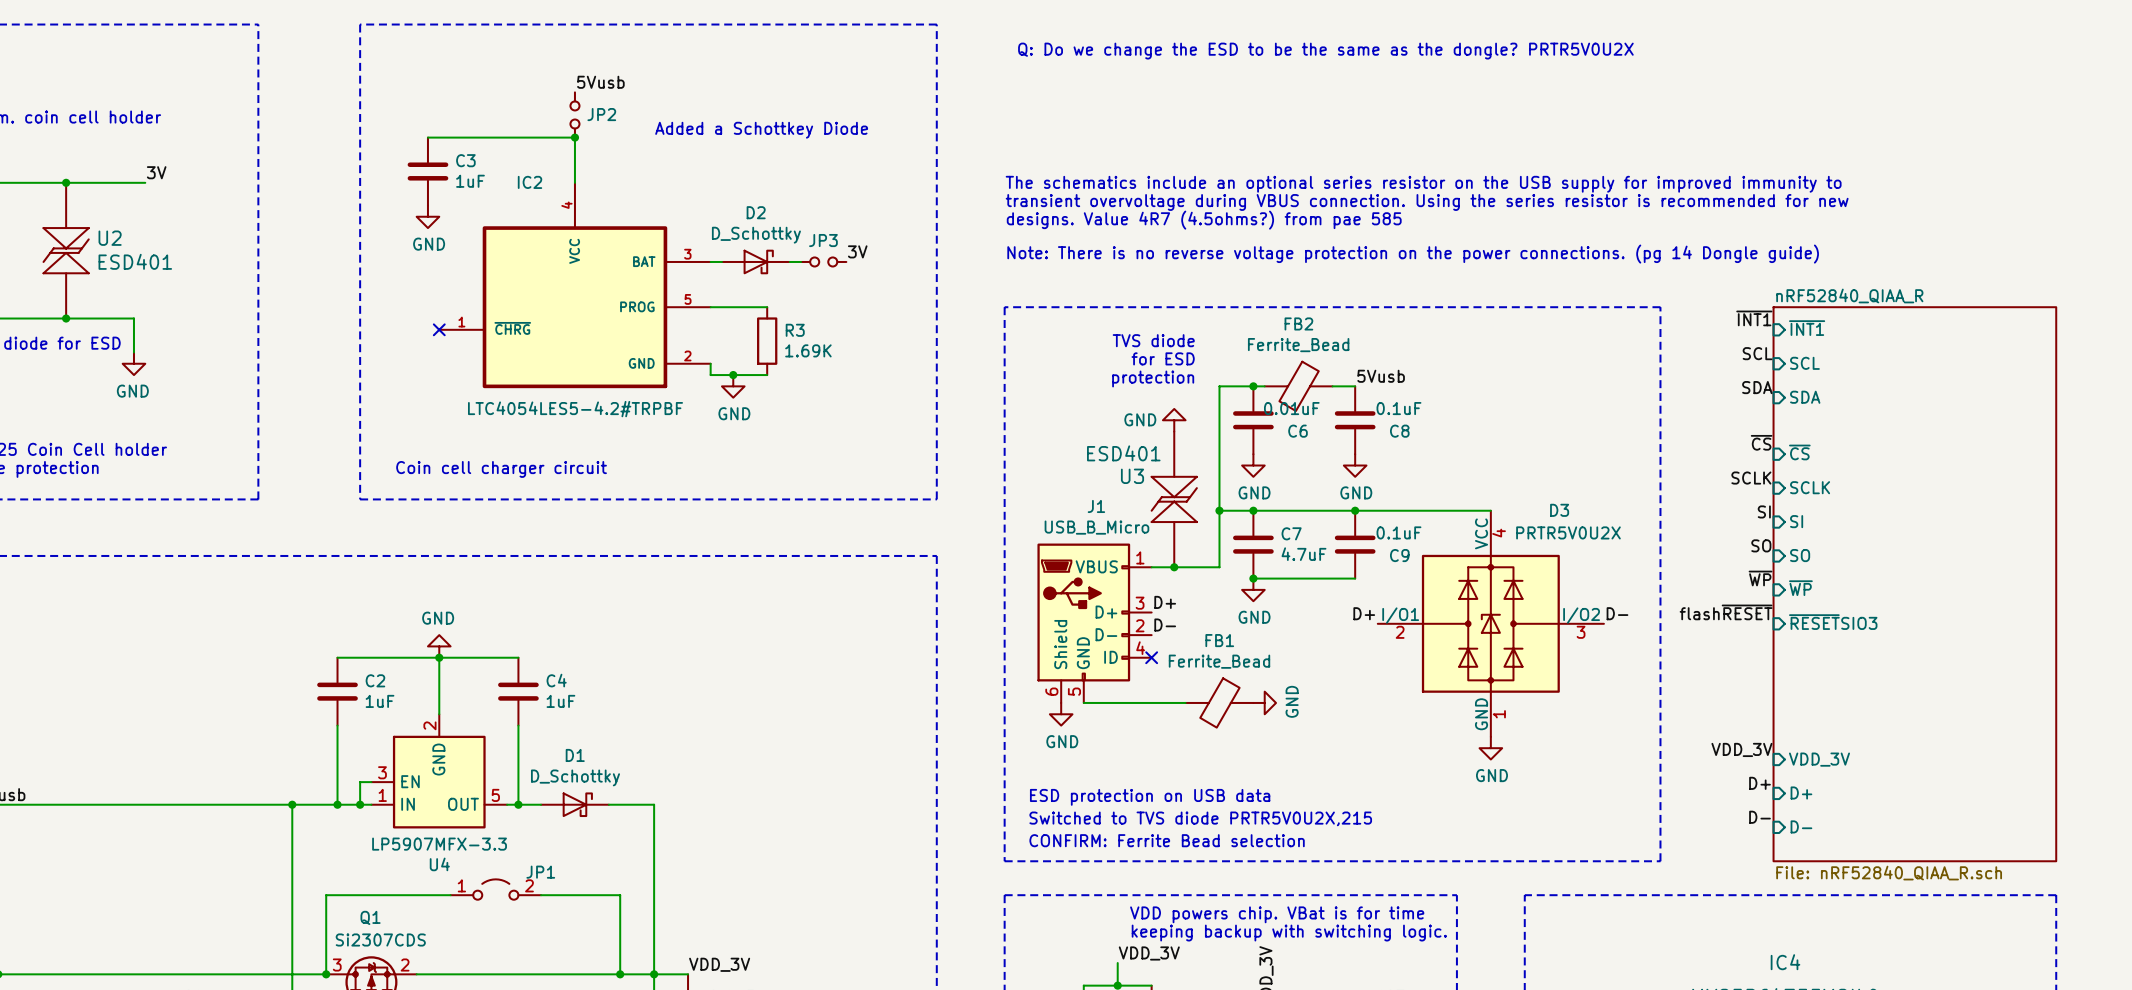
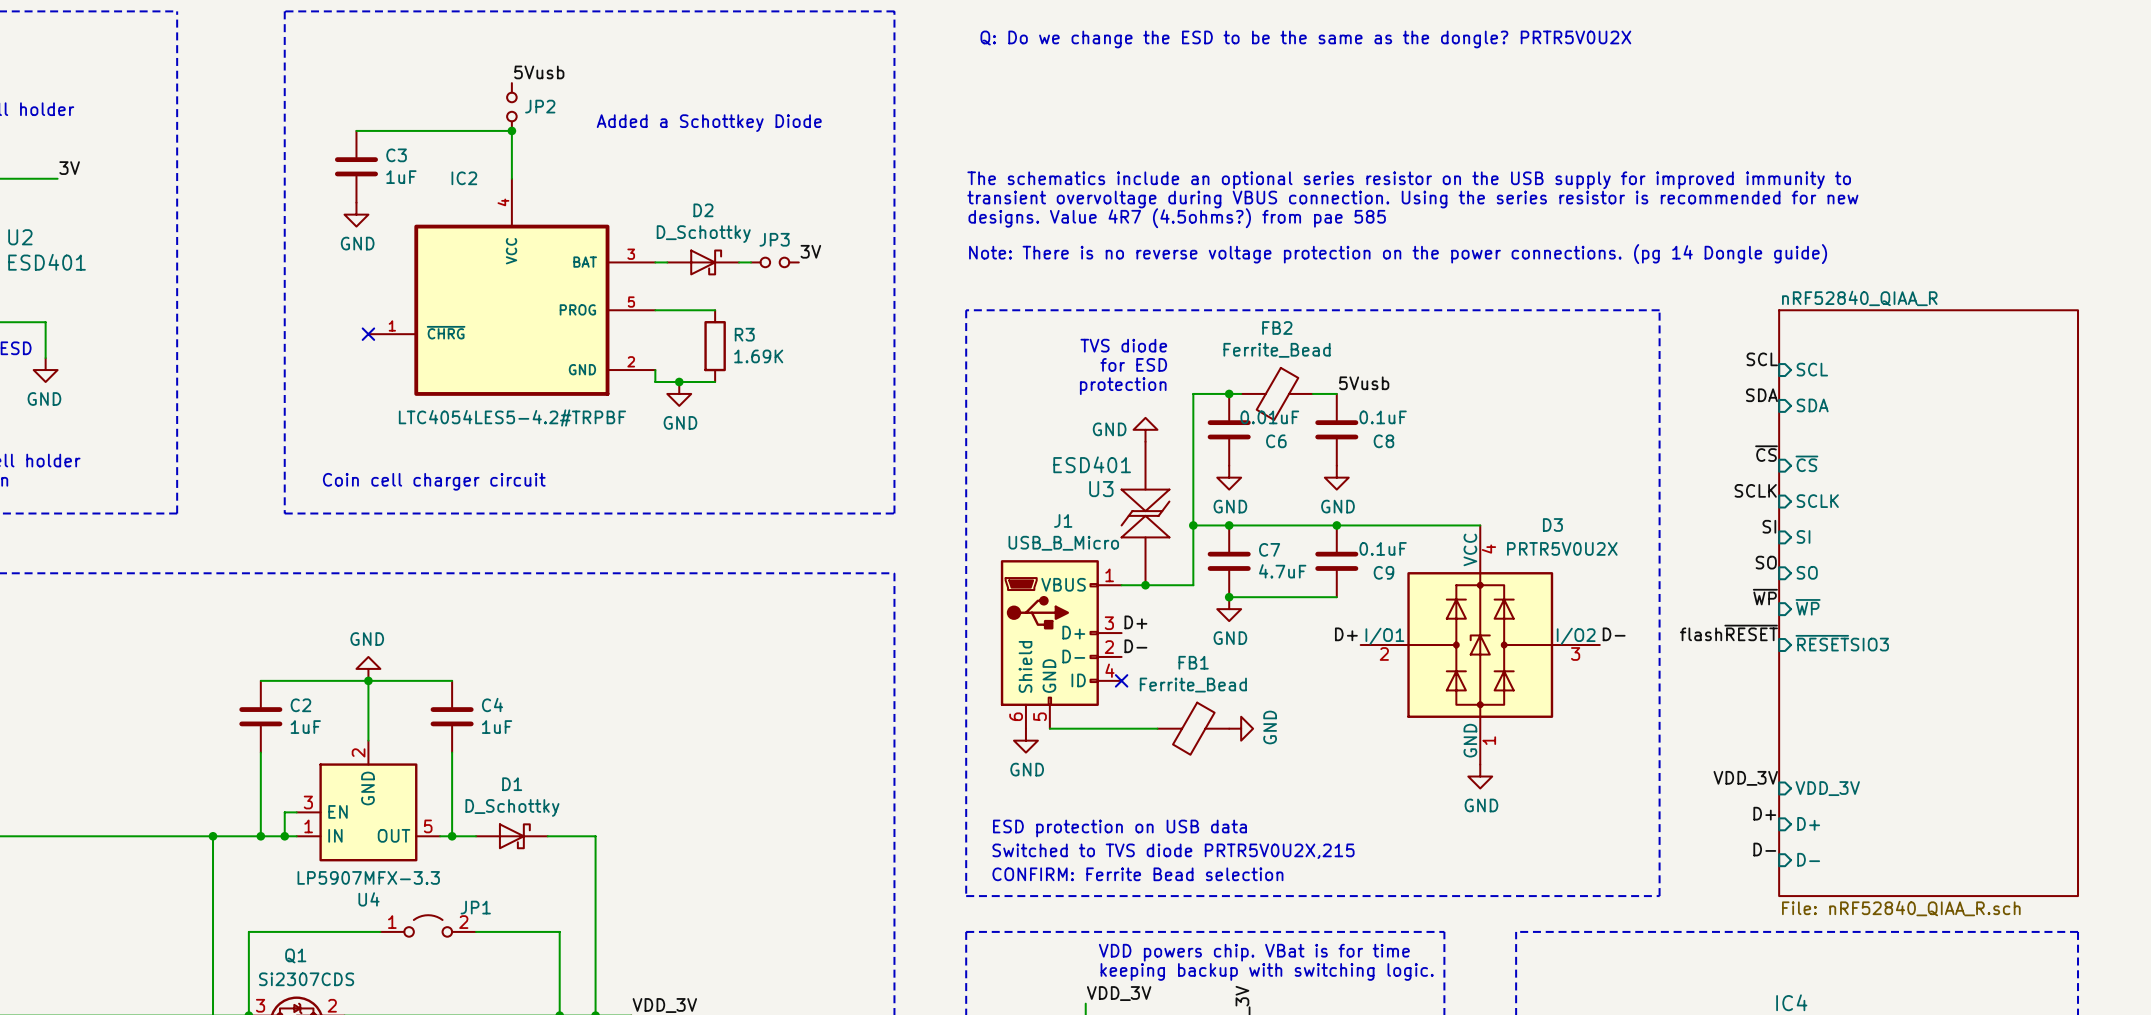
label: ~{INT1} (1754, 318) -> none
sheet pin: ~{INT1} (1807, 328) -> none

